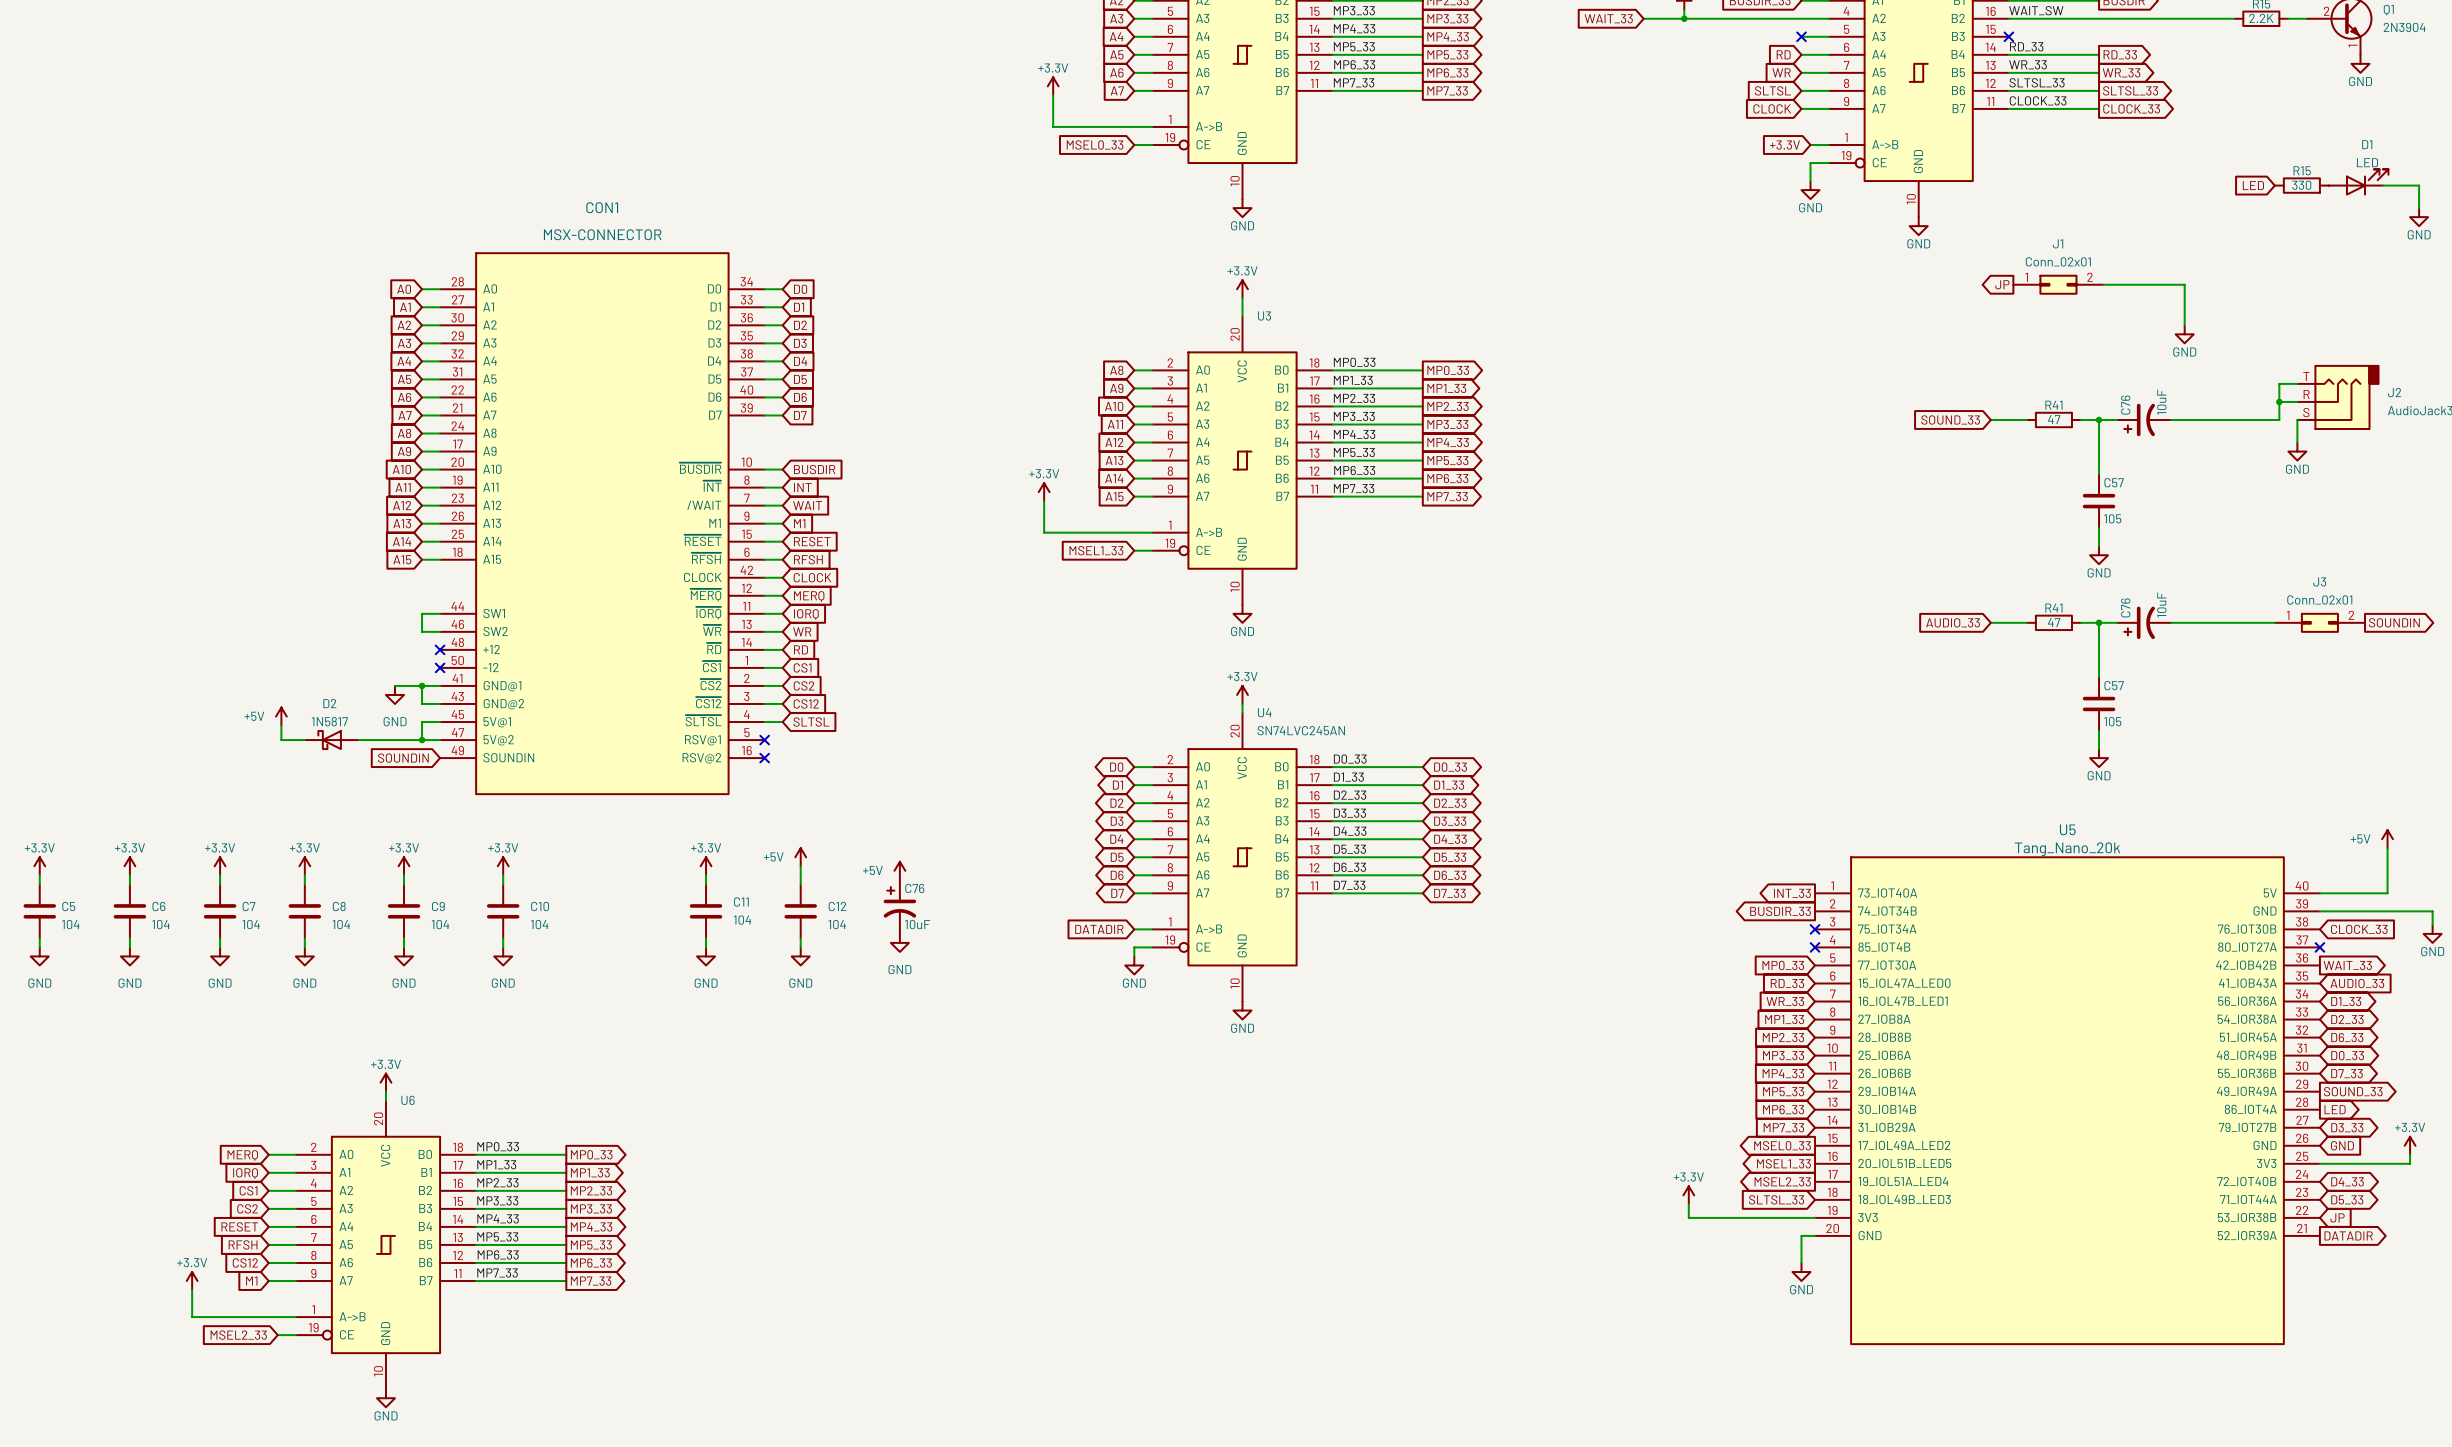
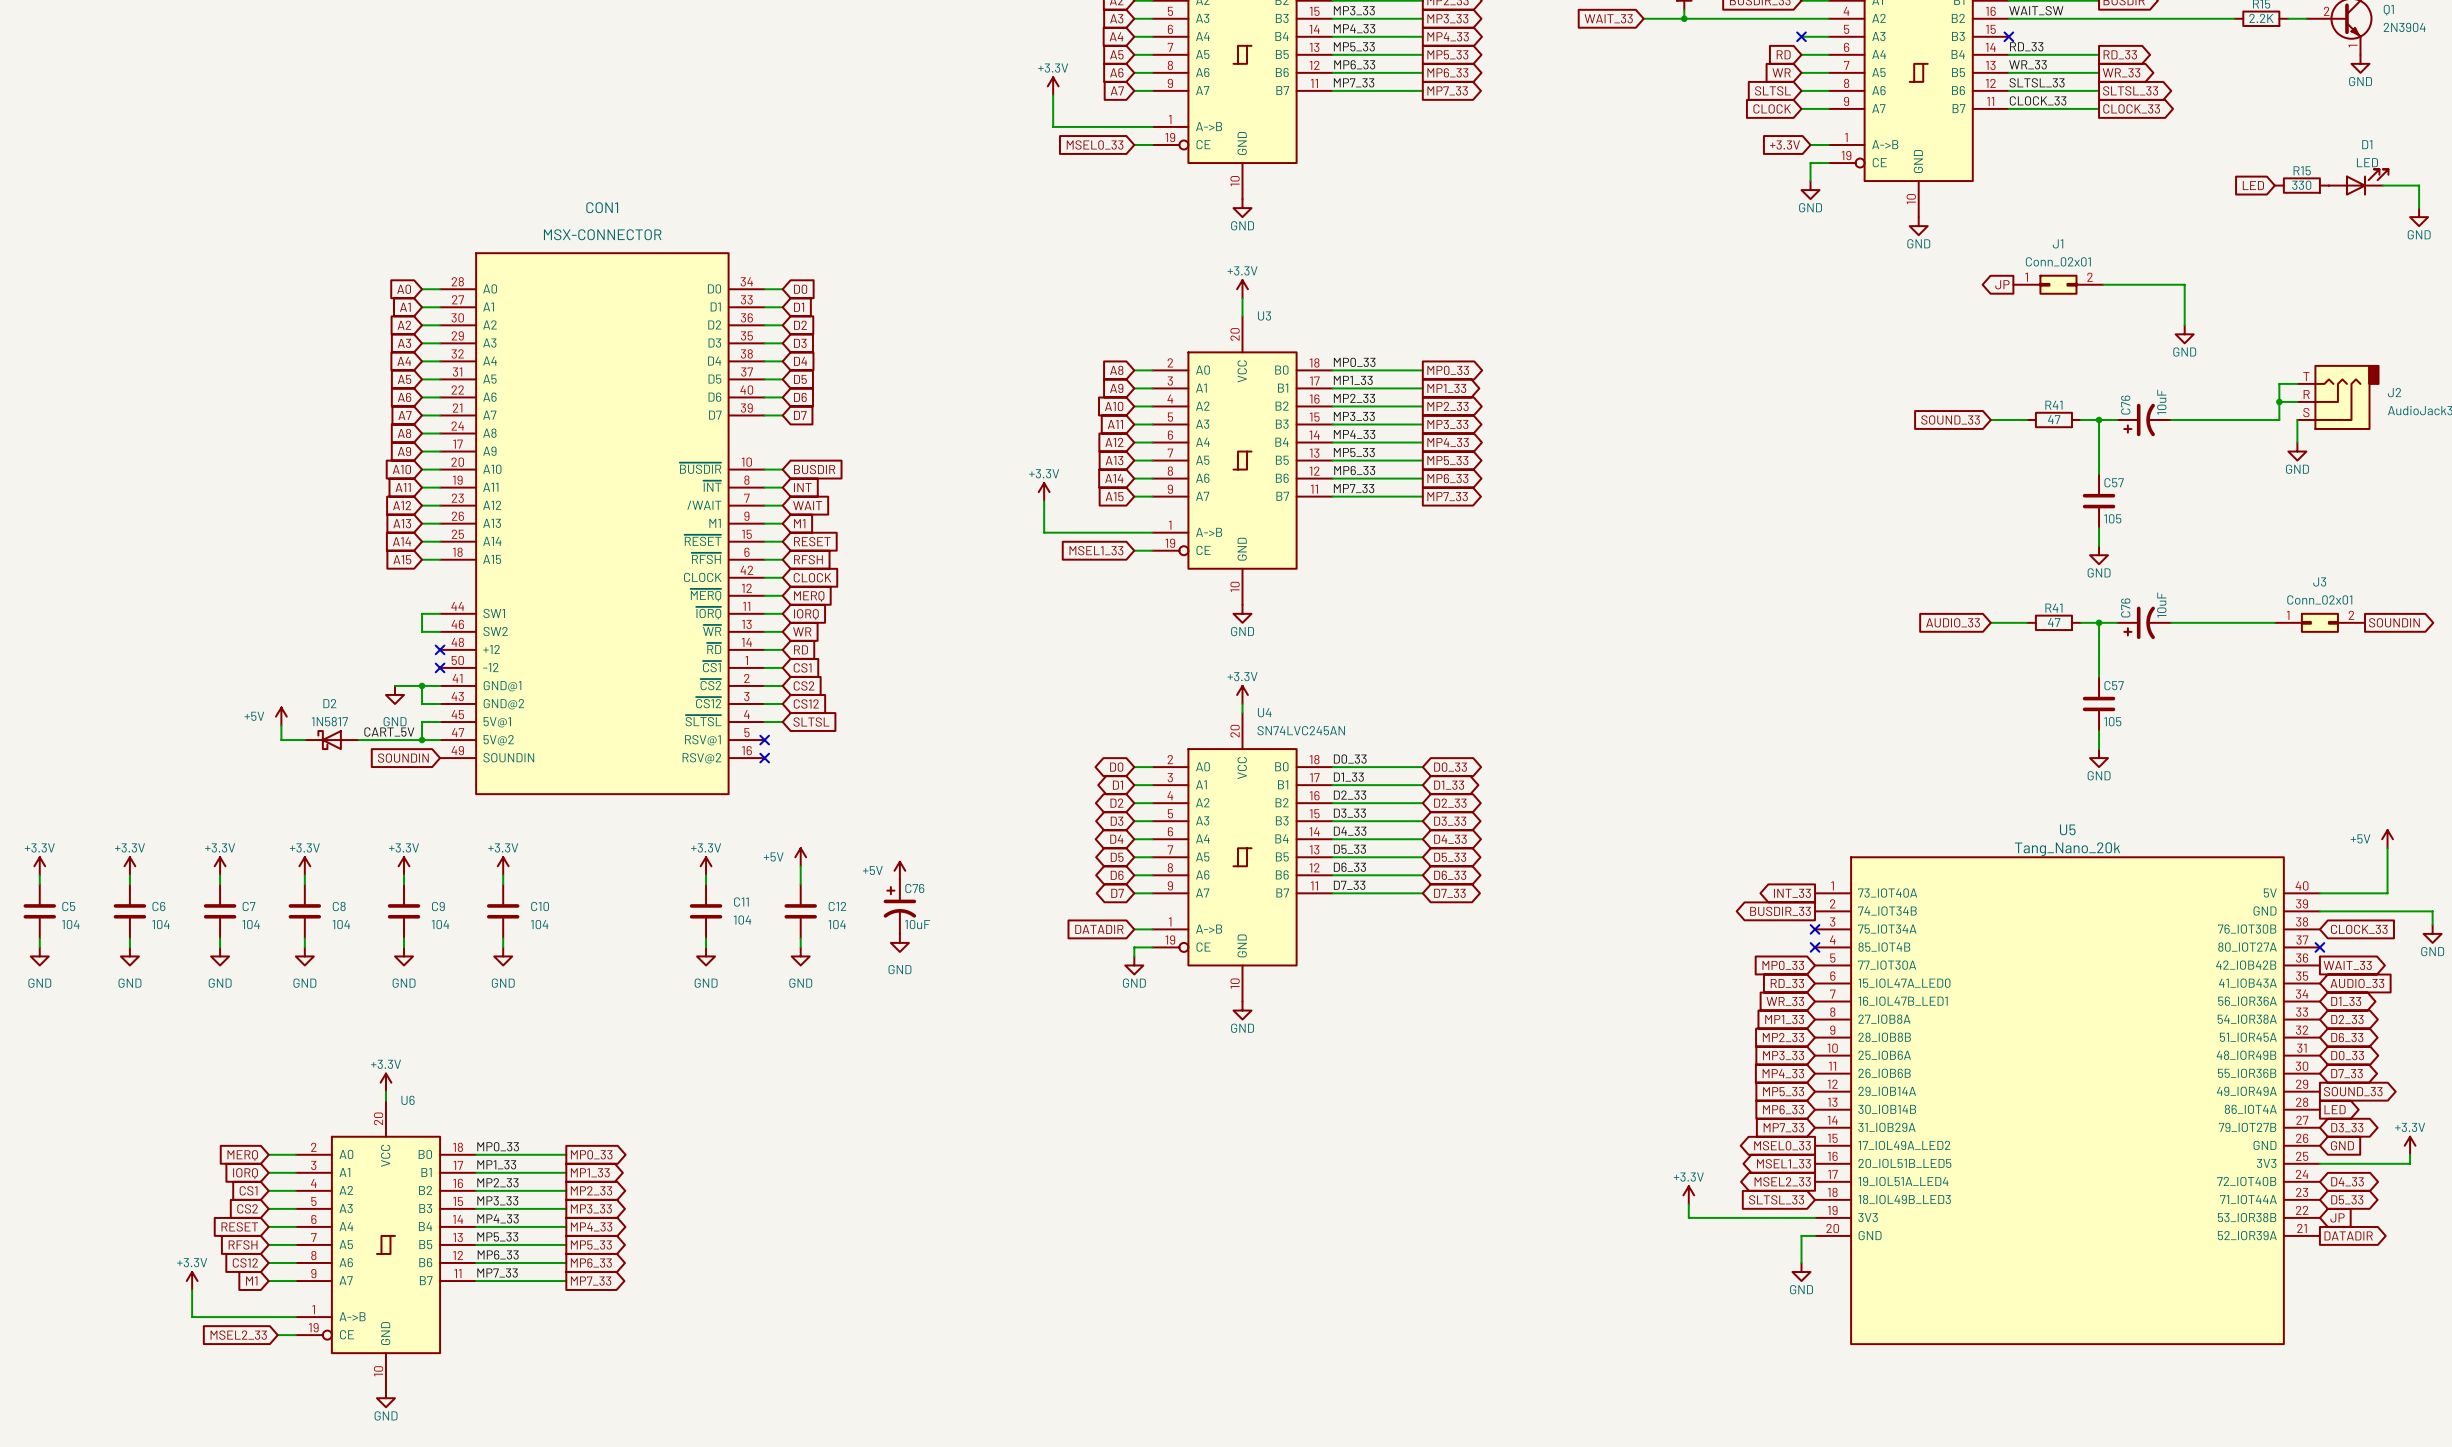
label: none -> CART_5V (389, 732)

